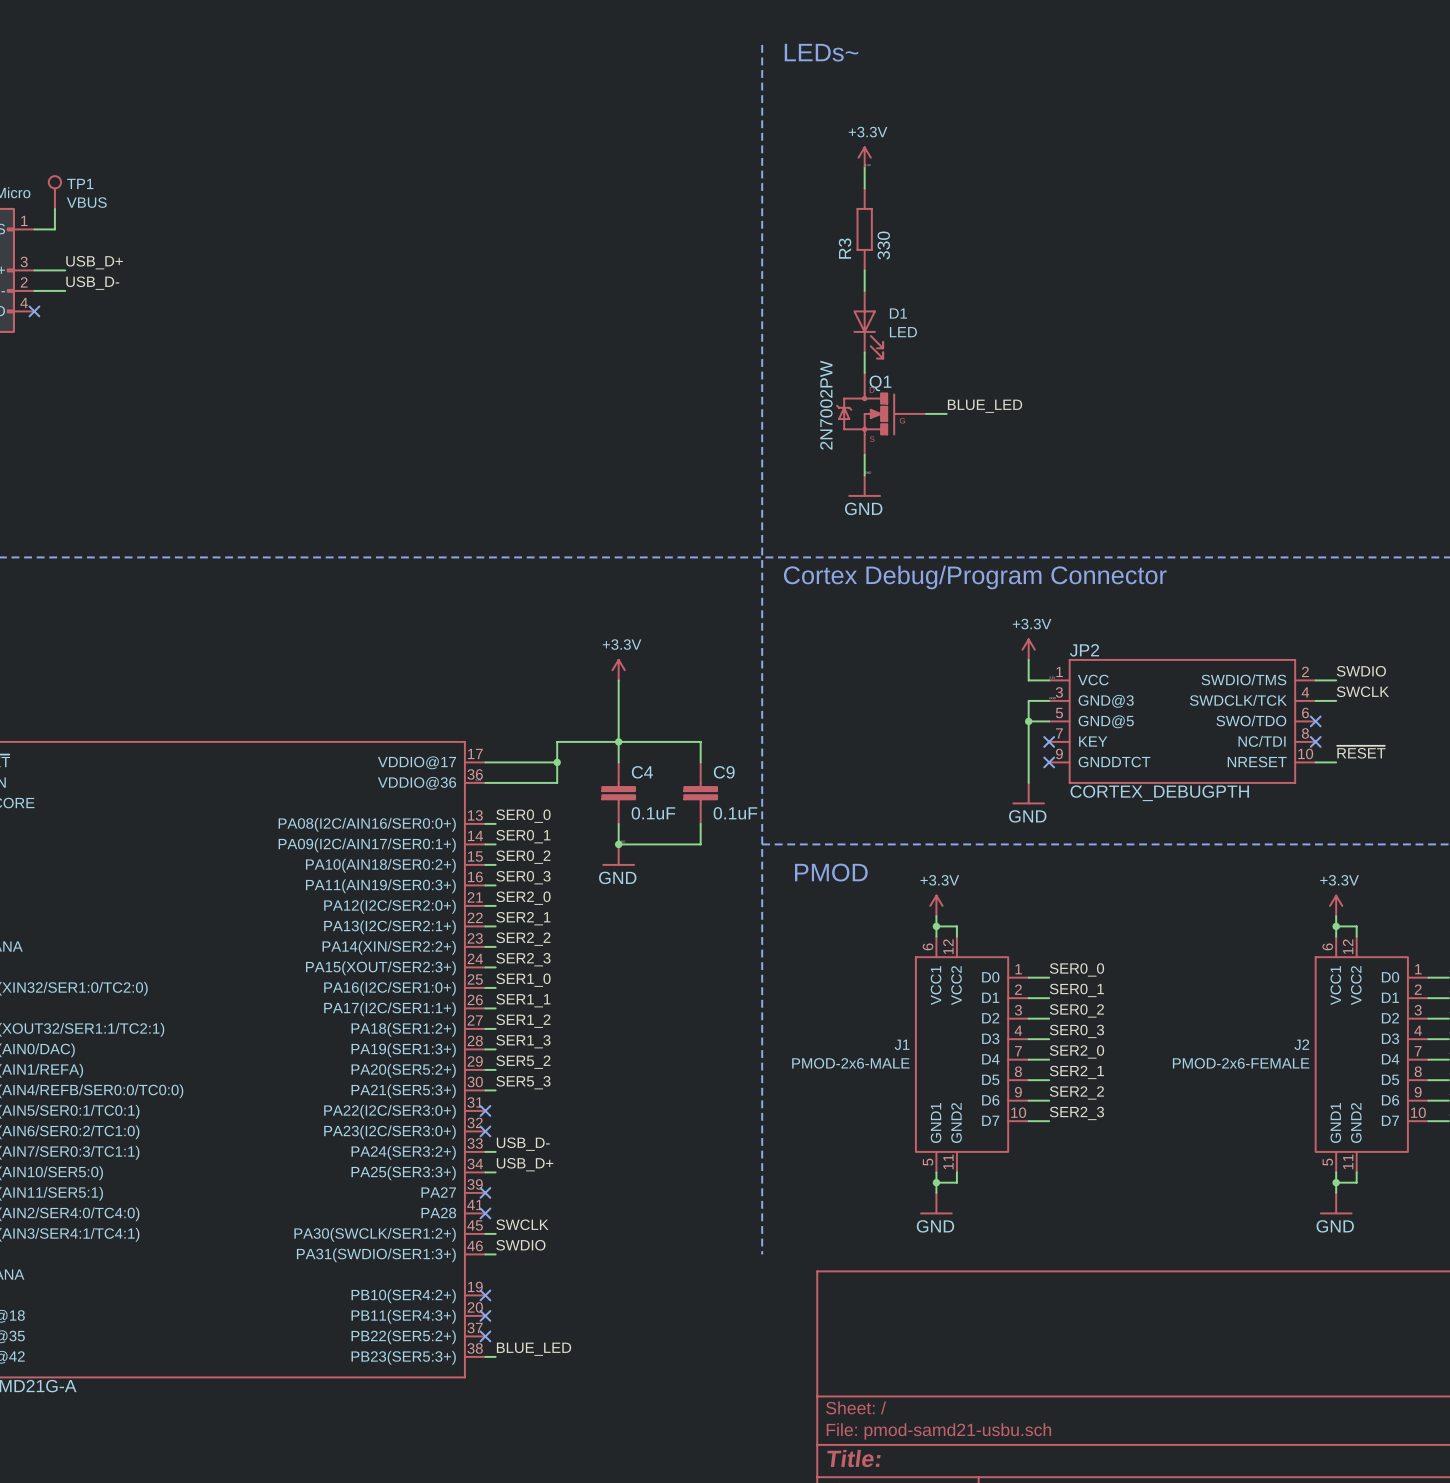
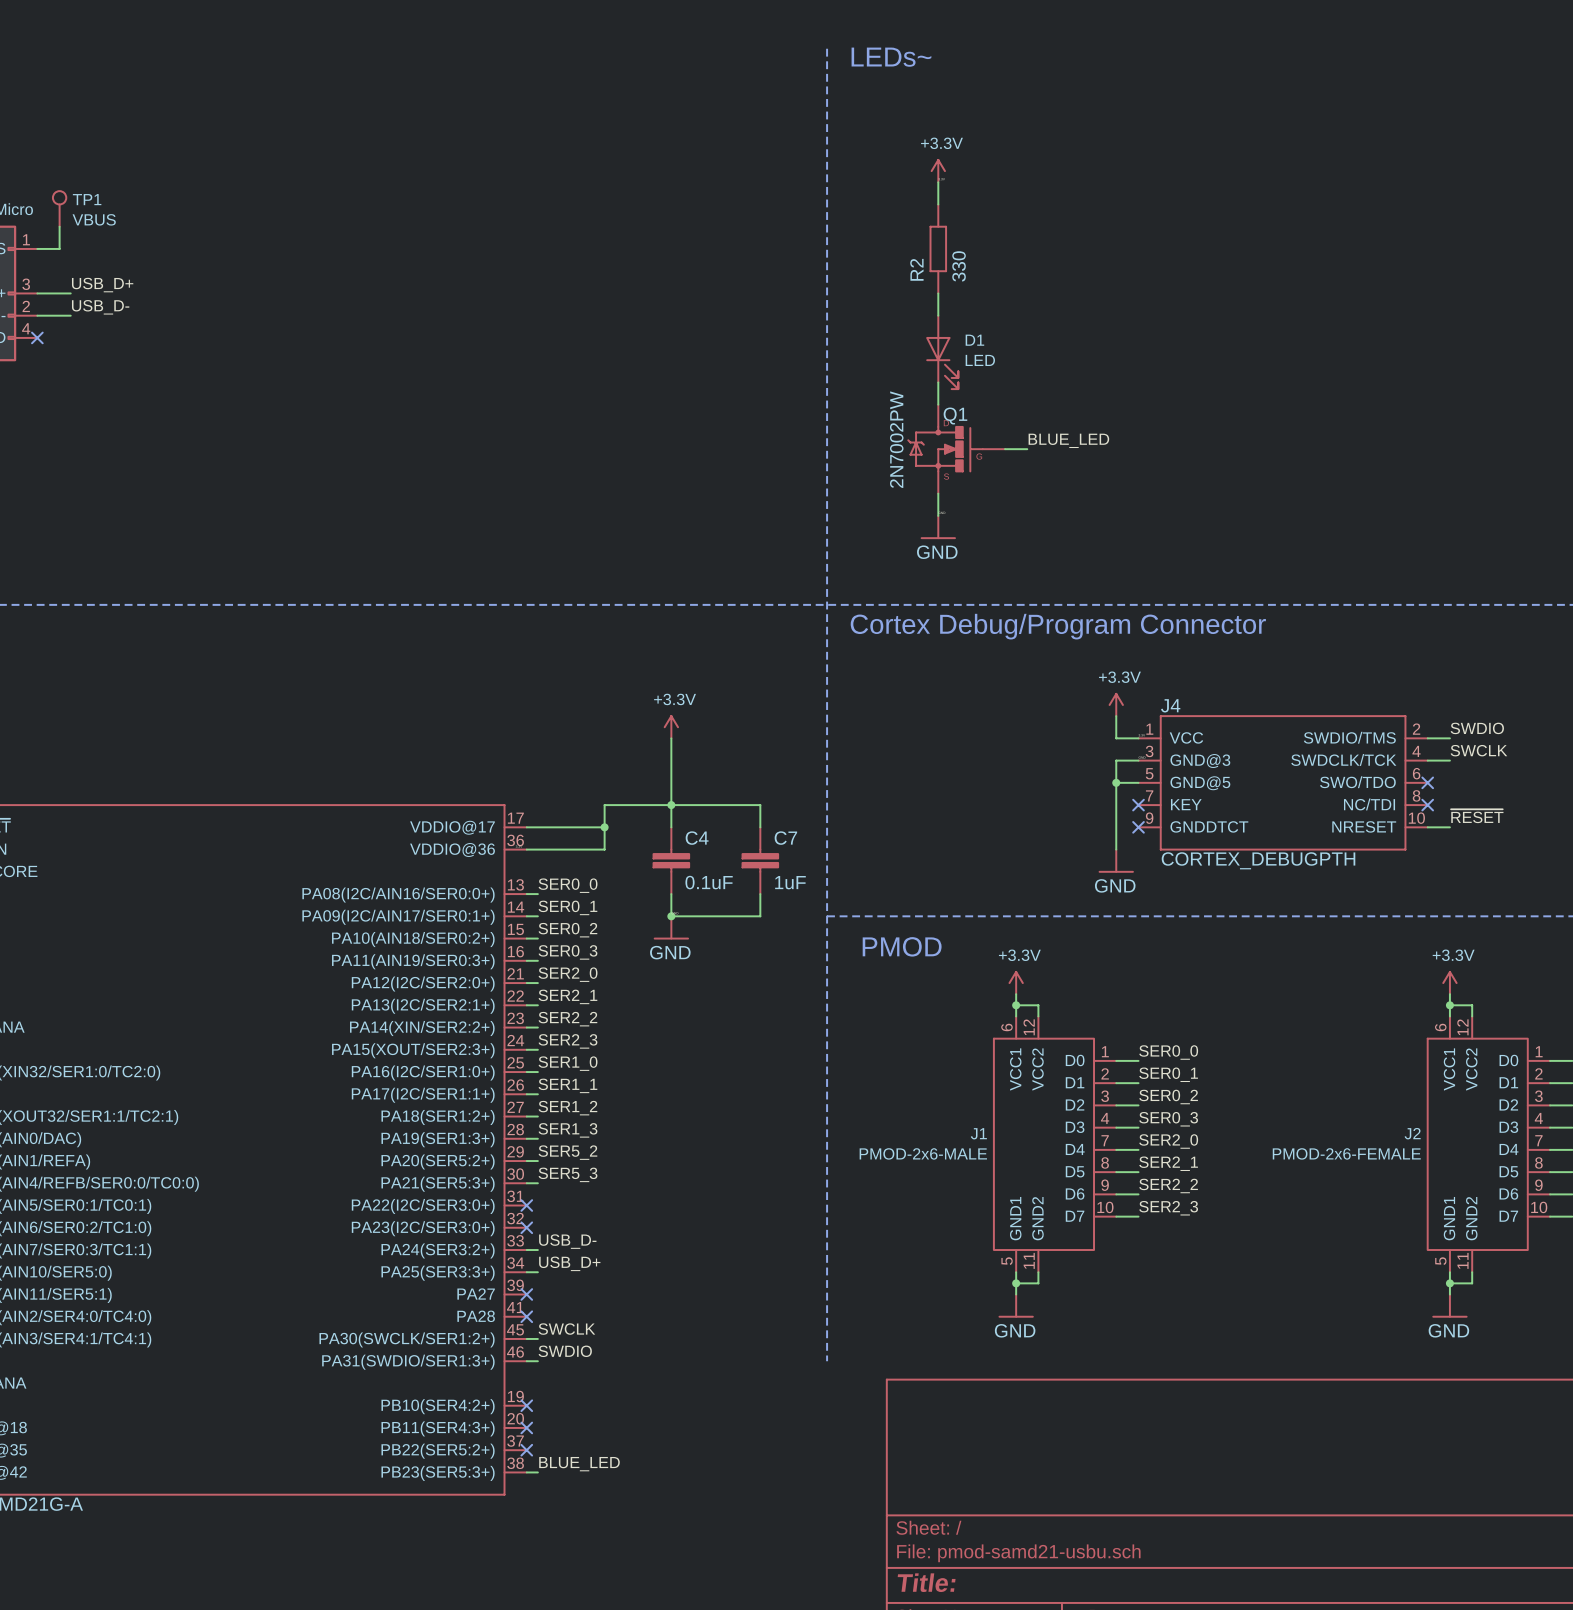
R3 name: R3 (845, 248) -> R2 (916, 269)
JP2 name: JP2 (1084, 650) -> J4 (1170, 705)
C9 name: C9 (724, 772) -> C7 (785, 838)
C9 value: 0.1uF (735, 813) -> 1uF (790, 882)

